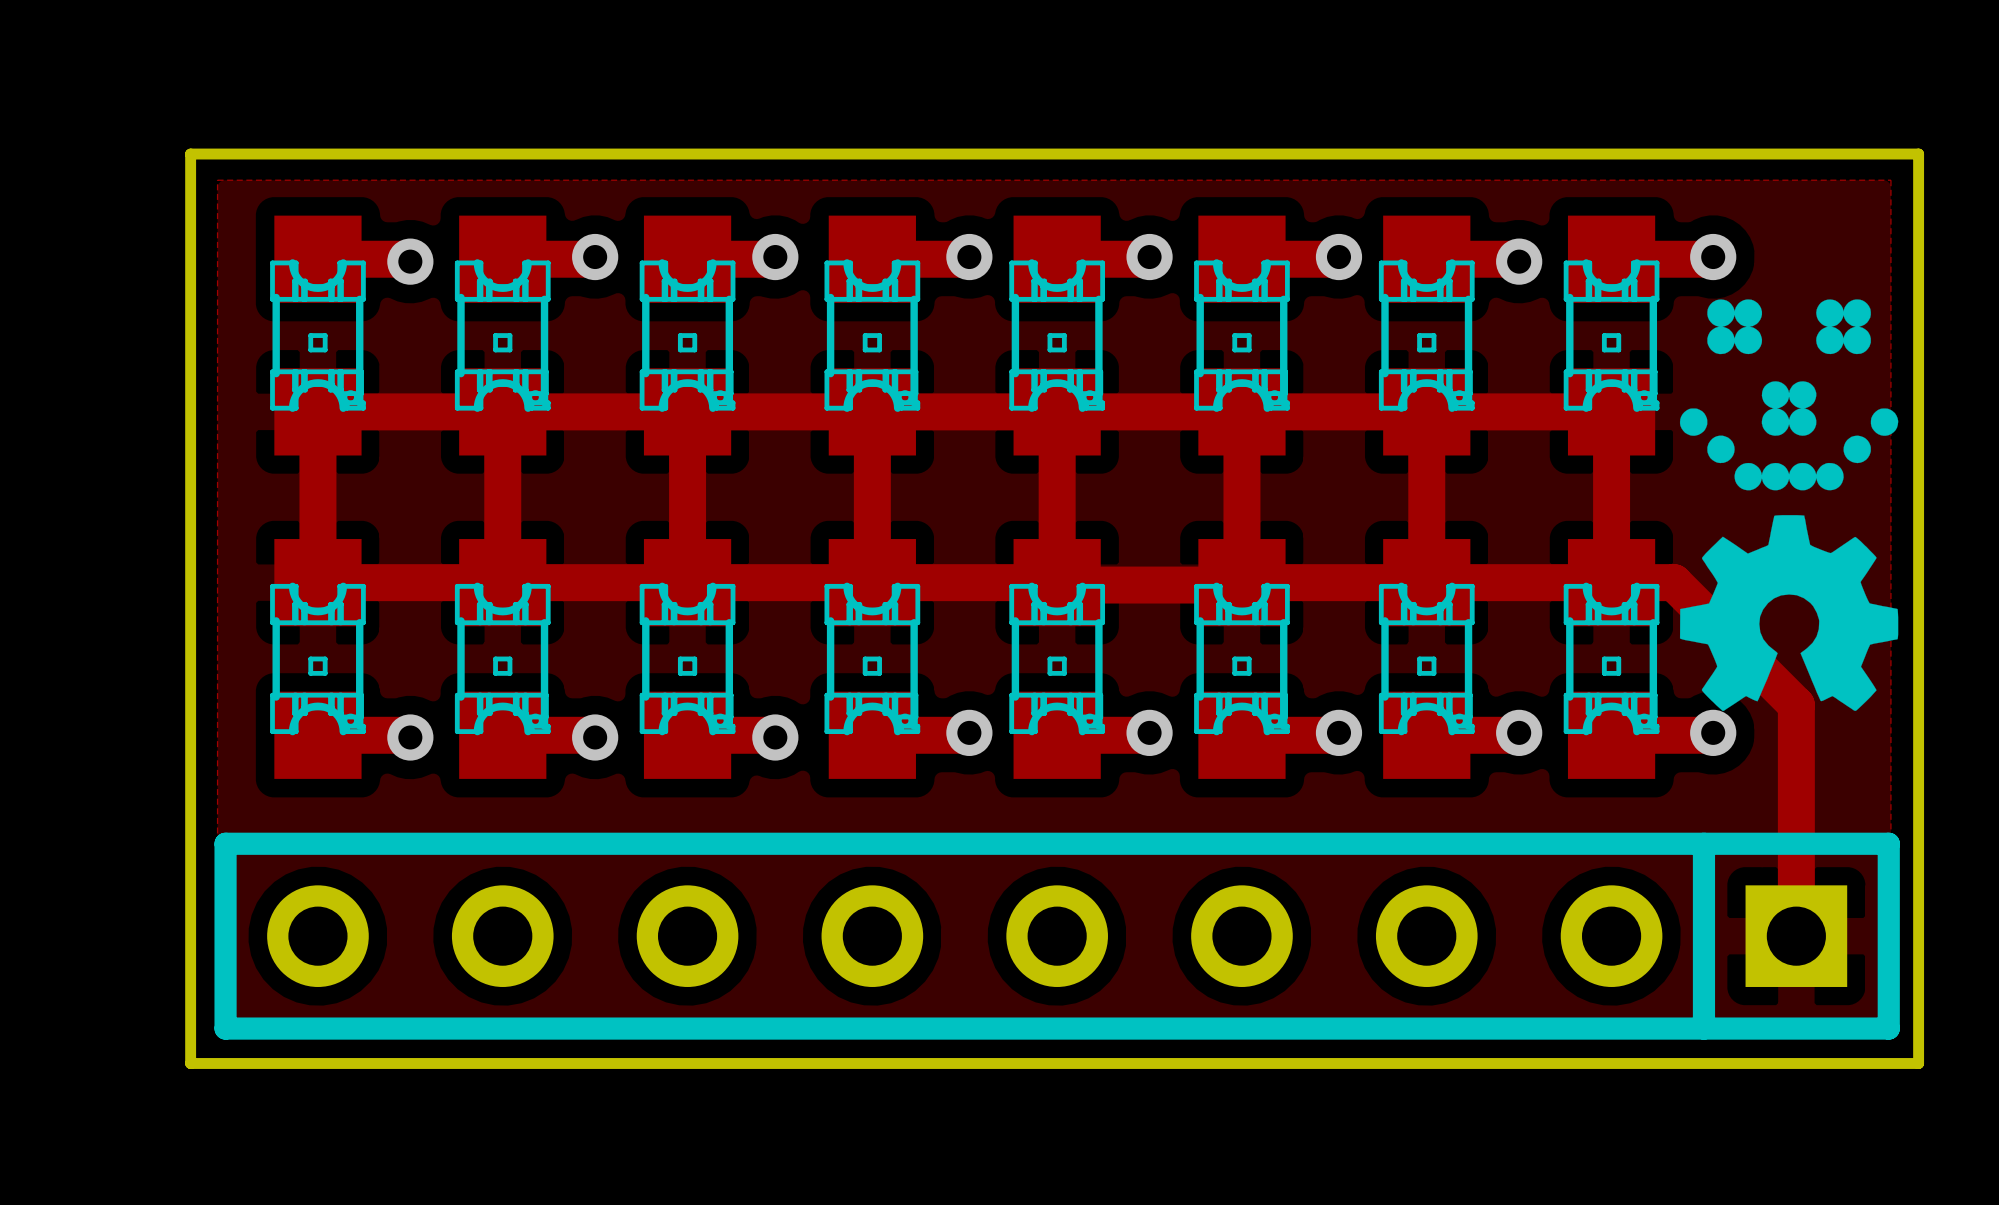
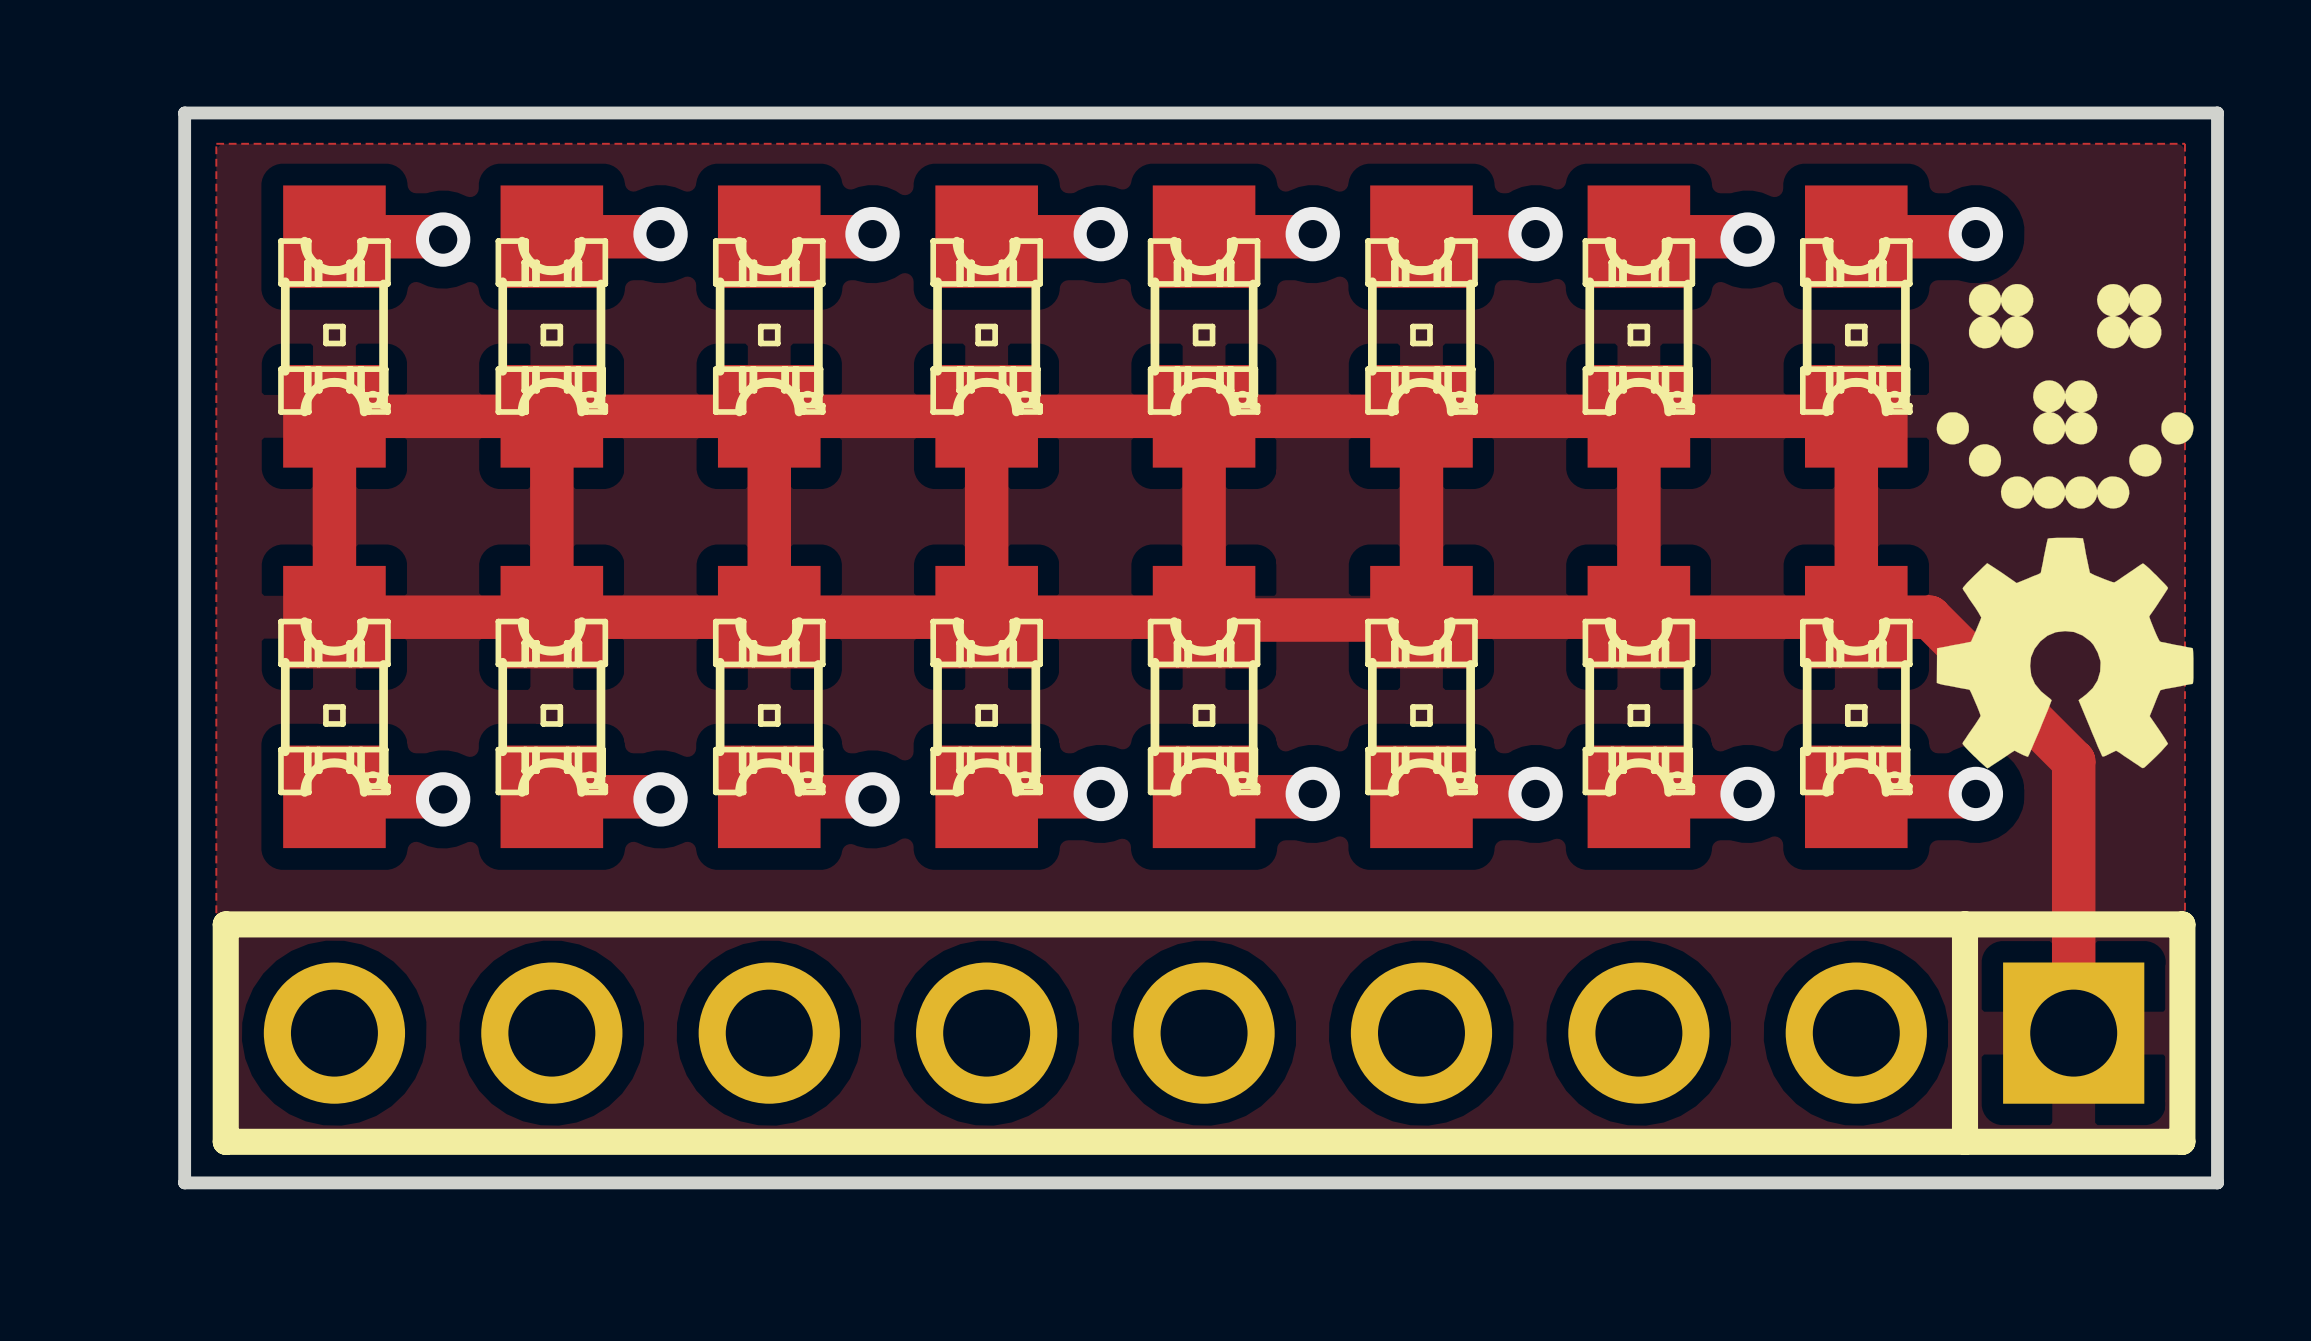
part footprint: [214, 832, 1900, 1040] -> [212, 911, 2196, 1155]

